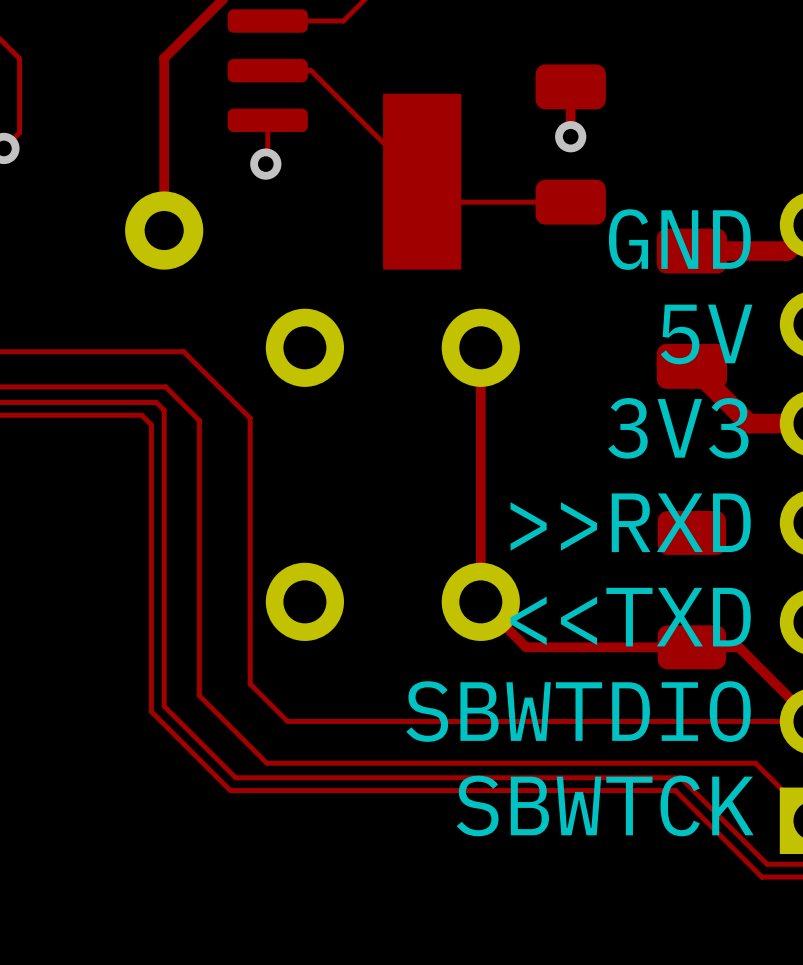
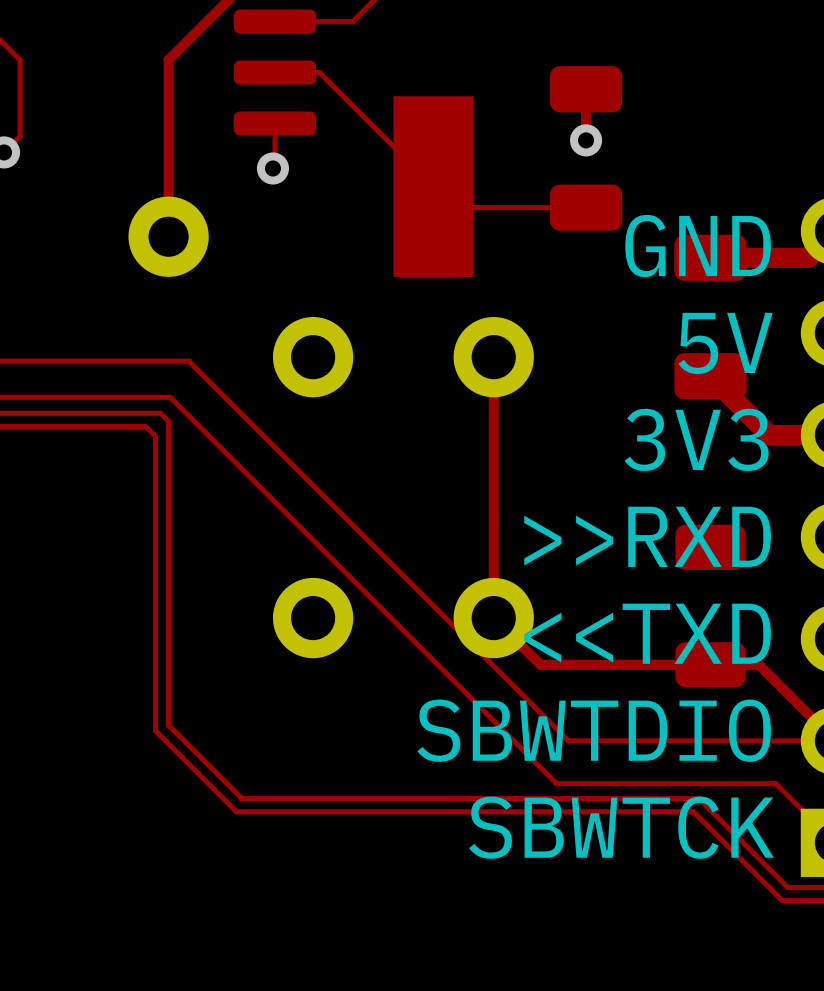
top track: (250, 418) (250, 683) (287, 721) (553, 721) -> (256, 429) (568, 740)
top track: (199, 420) (199, 695) (266, 763) (541, 763) -> (204, 431) (556, 783)

